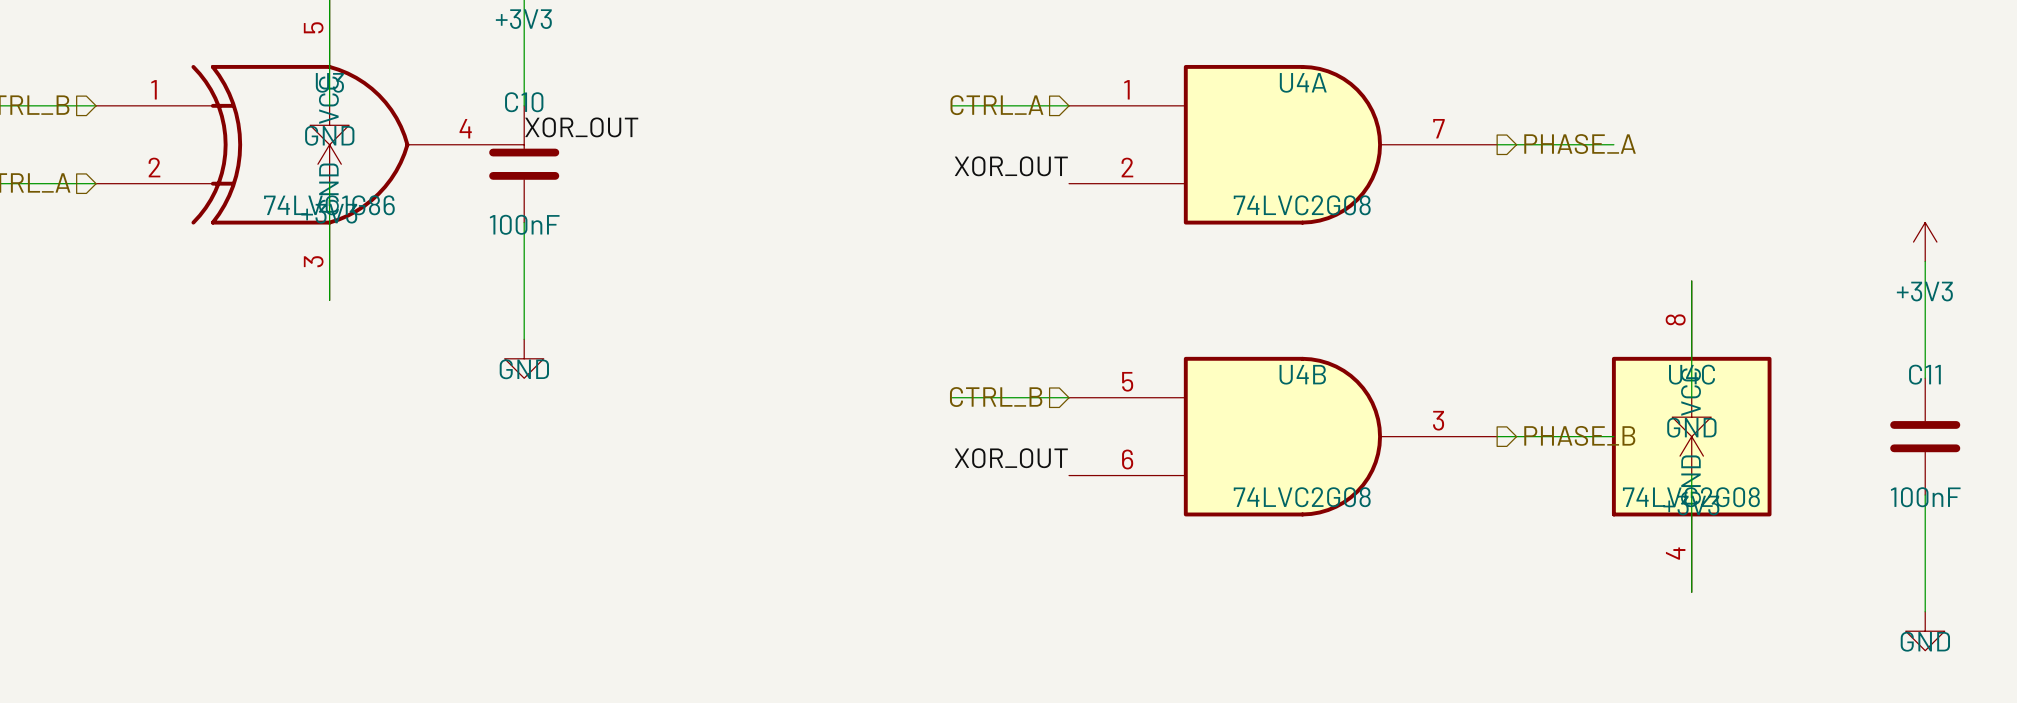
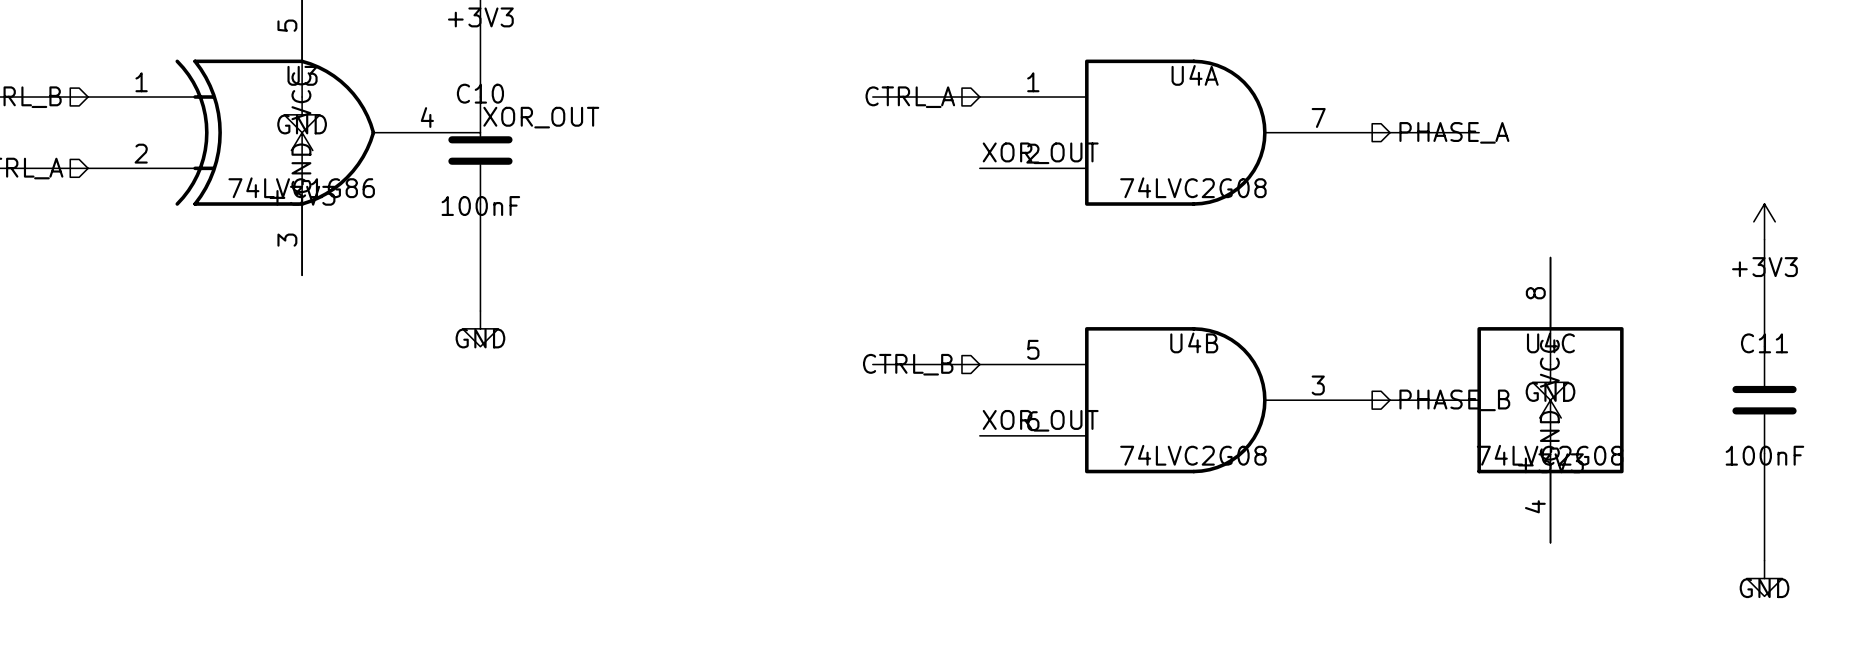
label position: XOR_OUT (1011, 166) -> XOR_OUT (1040, 153)
label position: XOR_OUT (1011, 458) -> XOR_OUT (1040, 420)

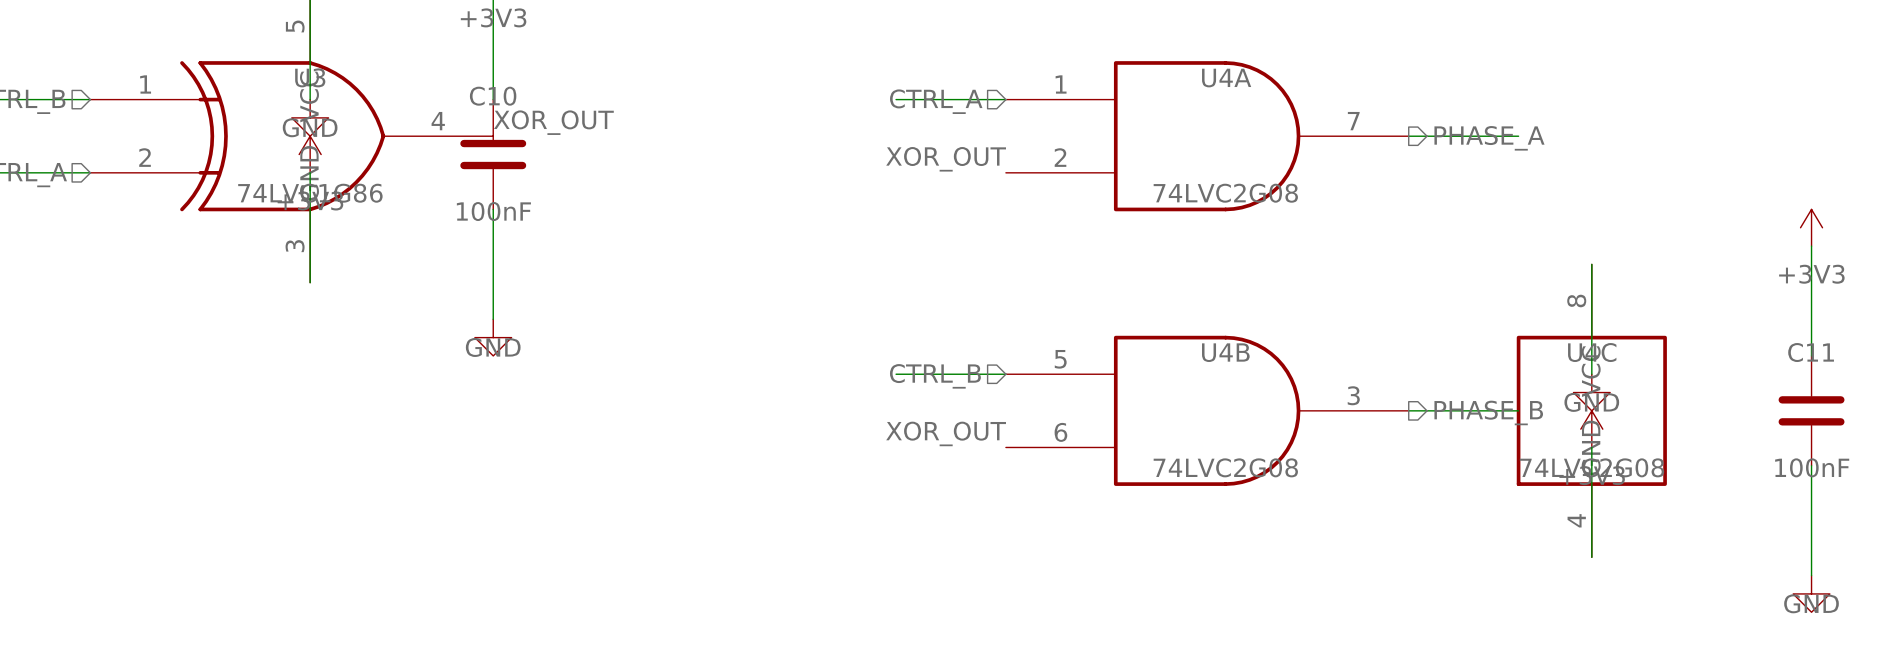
label position: XOR_OUT (1040, 153) -> XOR_OUT (946, 159)
label position: XOR_OUT (1040, 420) -> XOR_OUT (946, 433)

